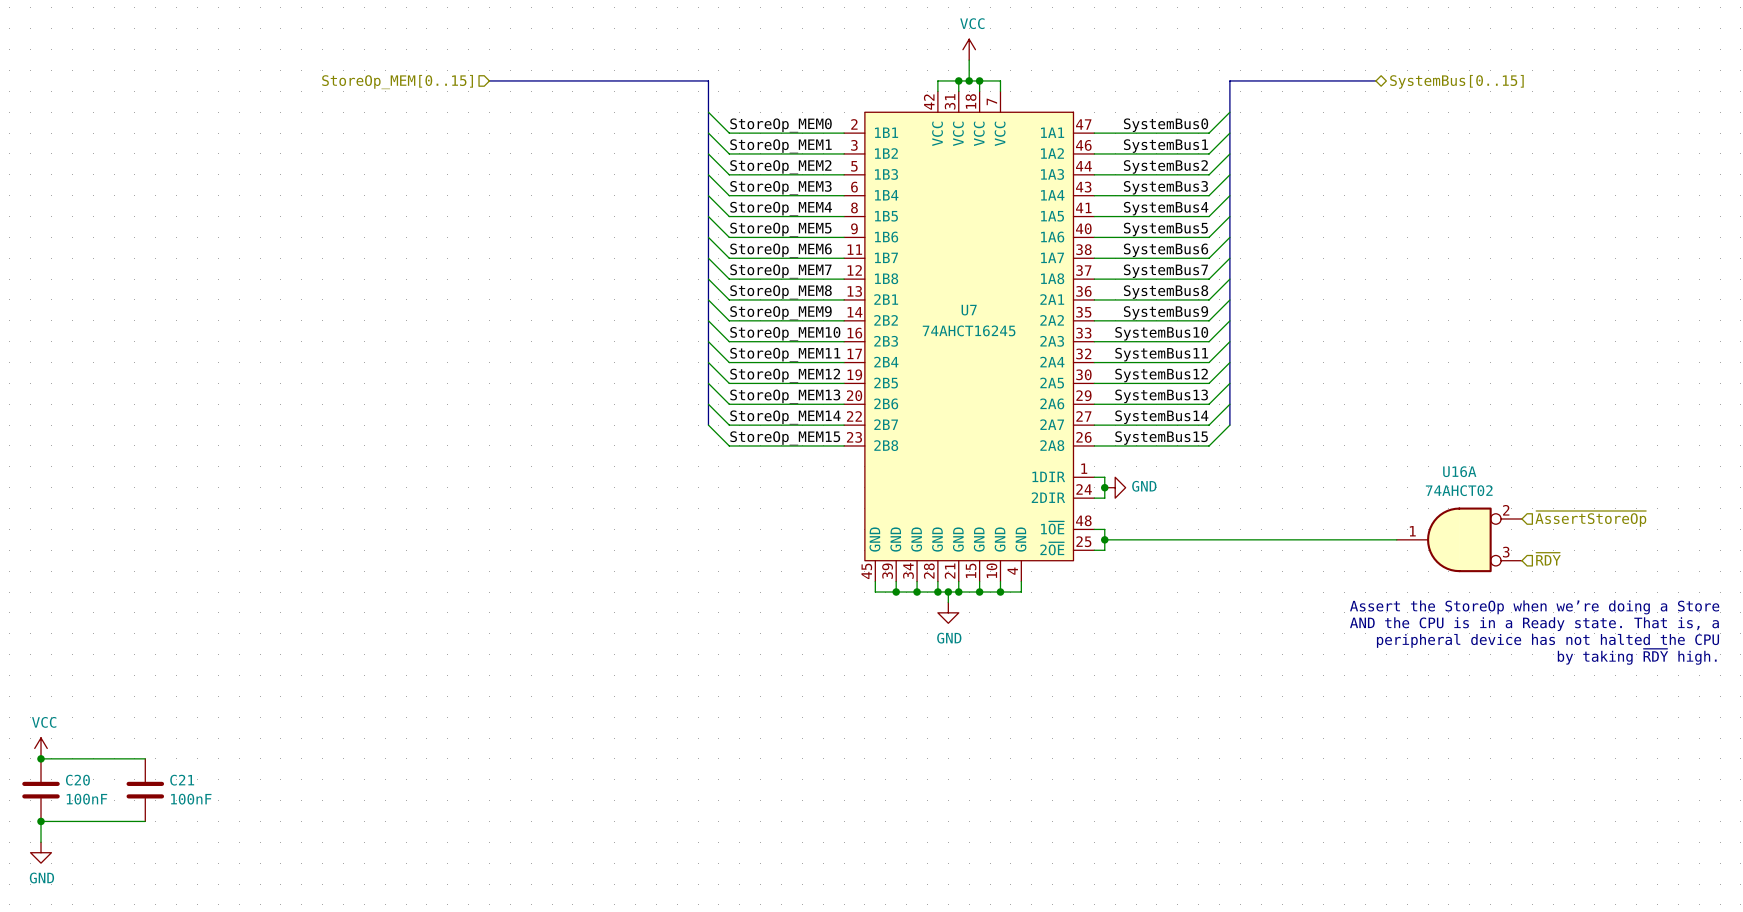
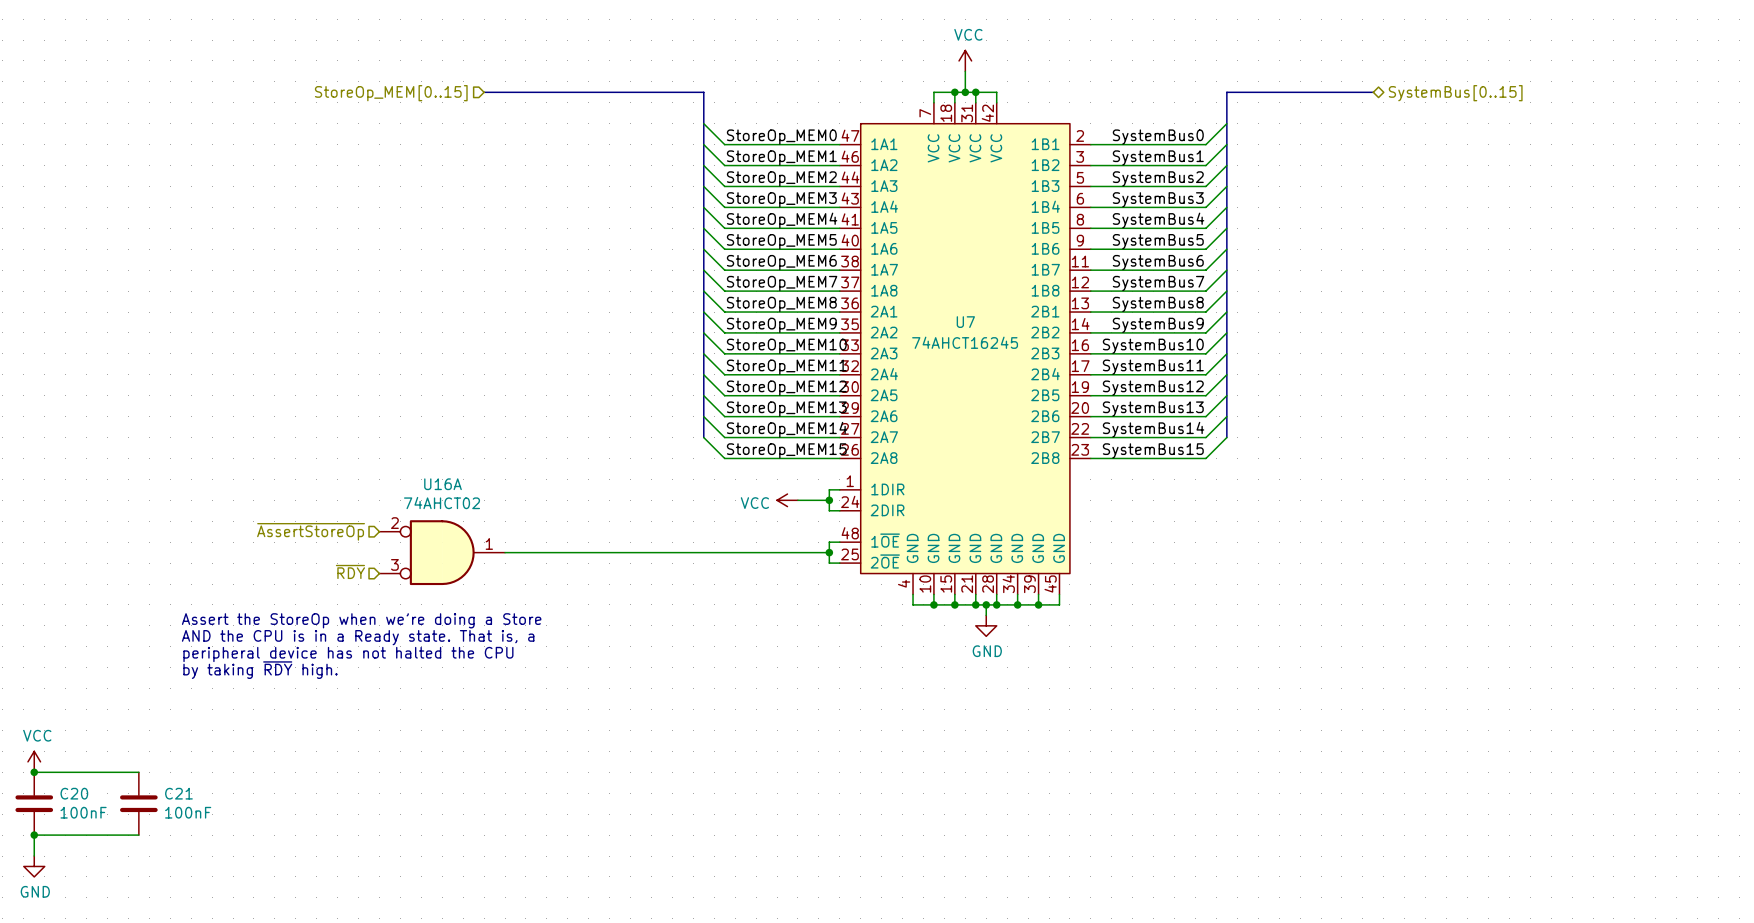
U7 flip: as is (969, 336) -> left-right (965, 348)
wire: none -> (839, 489) (829, 489) (829, 510) (839, 510)
wire: (1094, 477) (1104, 477) (1104, 498) (1094, 498) -> none
power symbol: none -> VCC (787, 500)
wire: none -> (797, 500) (829, 500)
junction: none -> (829, 500)
junction: (1104, 487) -> none
power symbol: GND (1115, 487) -> none
hierarchical label: none -> ~{AssertStoreOp} (311, 531)
hierarchical label: ~{AssertStoreOp} (1590, 518) -> none
wire: none -> (839, 542) (829, 542) (829, 563) (839, 563)
wire: (1094, 529) (1104, 529) (1104, 550) (1094, 550) -> none
wire: none -> (505, 552) (829, 552)
junction: none -> (829, 552)
wire: (1104, 539) (1396, 539) -> none
junction: (1104, 539) -> none
U16A flip: as is (1459, 539) -> left-right (442, 552)
U16A position: (1459, 539) -> (442, 552)
hierarchical label: none -> ~{RDY} (350, 571)
hierarchical label: ~{RDY} (1548, 559) -> none
wire: (875, 581) (875, 592) (917, 592) -> none
wire: (896, 581) (896, 592) -> (1038, 594) (1038, 604)
wire: none -> (1059, 594) (1059, 604) (1017, 604)
junction: (896, 592) -> none
junction: (917, 592) -> none
wire: (948, 592) (948, 602) -> (986, 604) (986, 615)
junction: (948, 592) -> none
junction: none -> (986, 604)
junction: none -> (1017, 604)
junction: none -> (1038, 604)
text: none -> Assert the StoreOp when we’re doing a Store (361, 620)
text: Assert the StoreOp when we’re doing a Store (1534, 607) -> none
power symbol position: GND (948, 612) -> GND (986, 625)
text: none -> AND the CPU is in a Ready state. That is, a (358, 637)
text: AND the CPU is in a Ready state. That is, a (1534, 624) -> none
text: none -> peripheral device has not halted the CPU (348, 654)
text: peripheral device has not halted the CPU (1547, 640) -> none
text: none -> by taking ~{RDY} high. (260, 670)
text: by taking ~{RDY} high. (1637, 656) -> none

